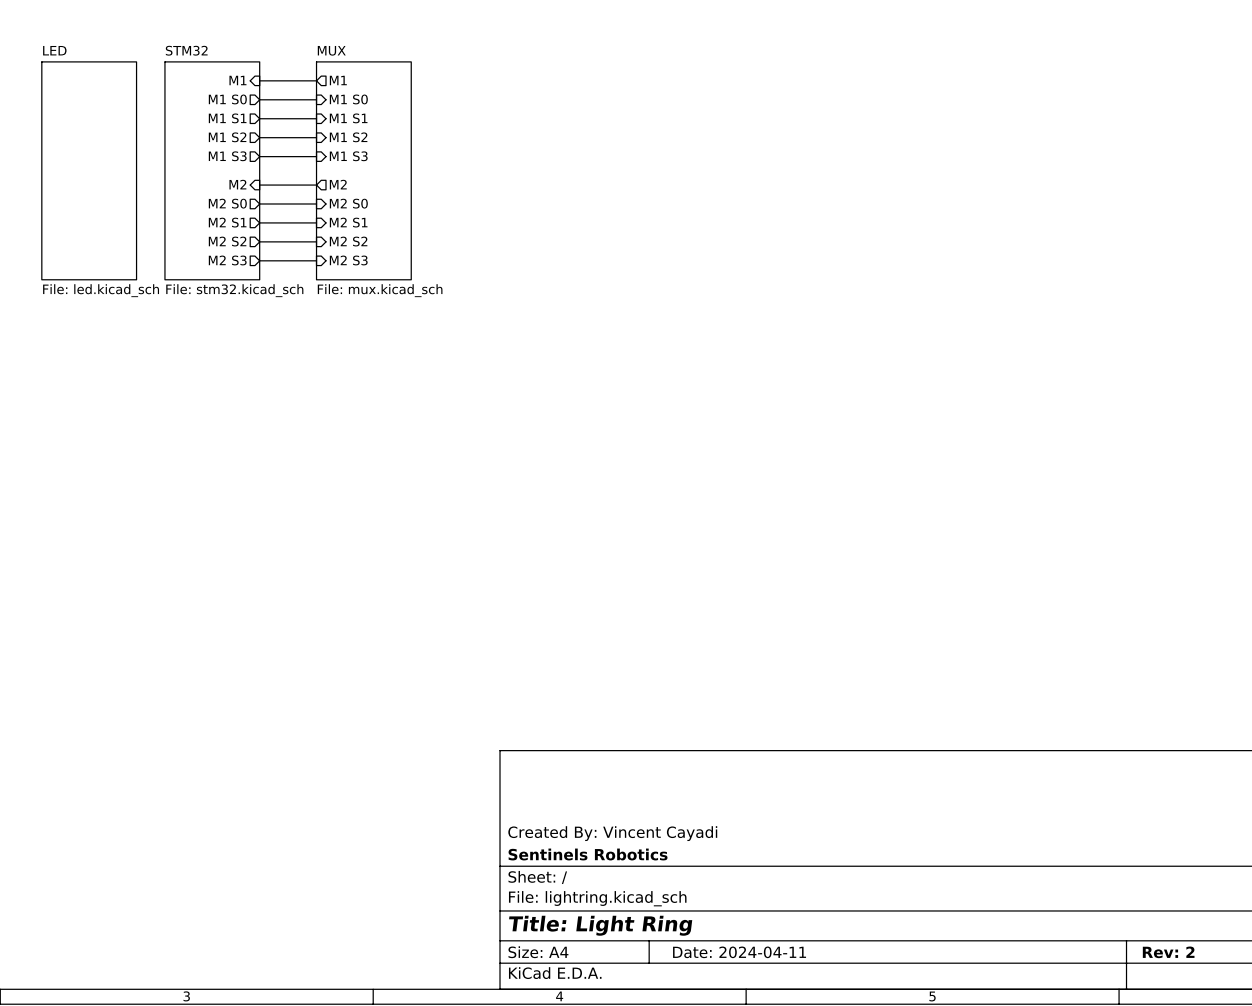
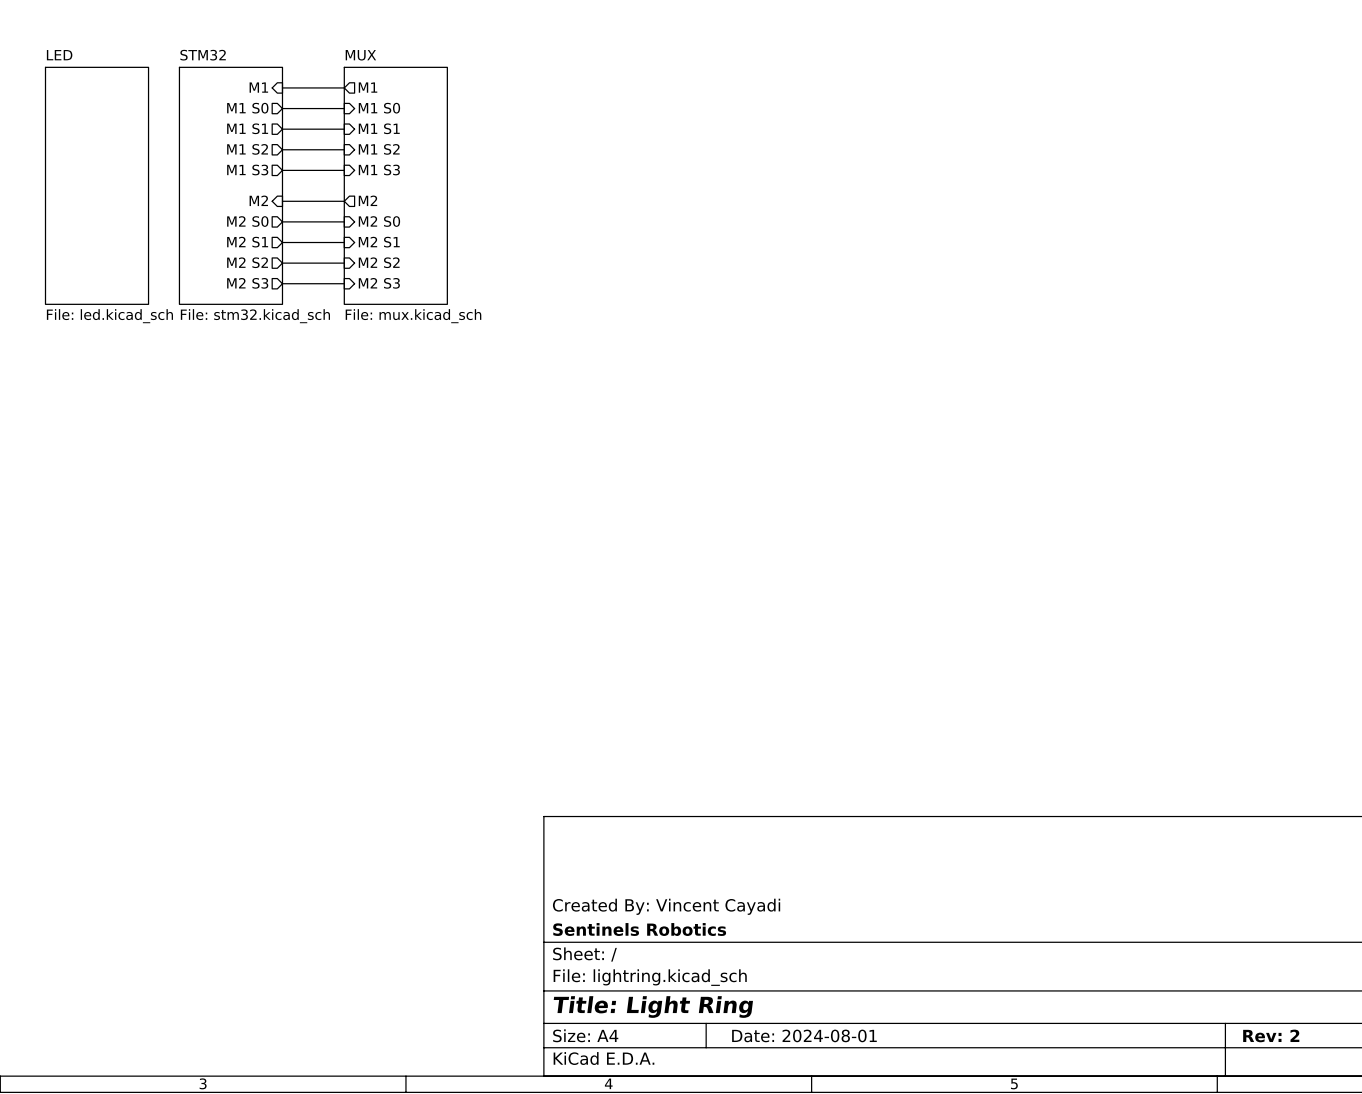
title block: Date: 2024-04-11 (739, 952) -> Date: 2024-08-01 (804, 1035)

